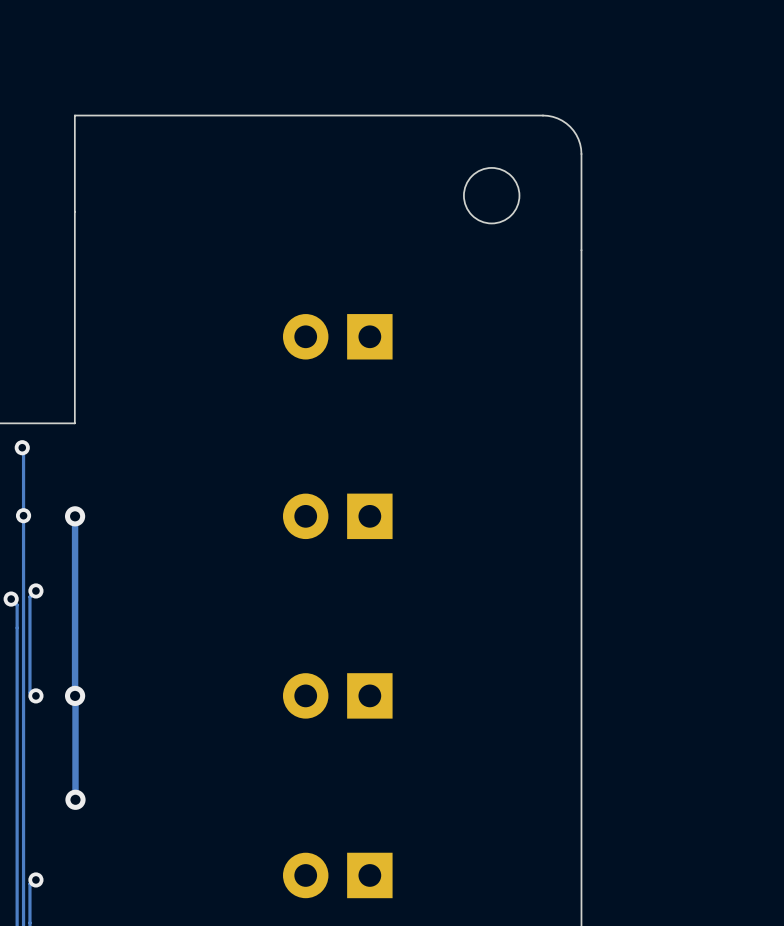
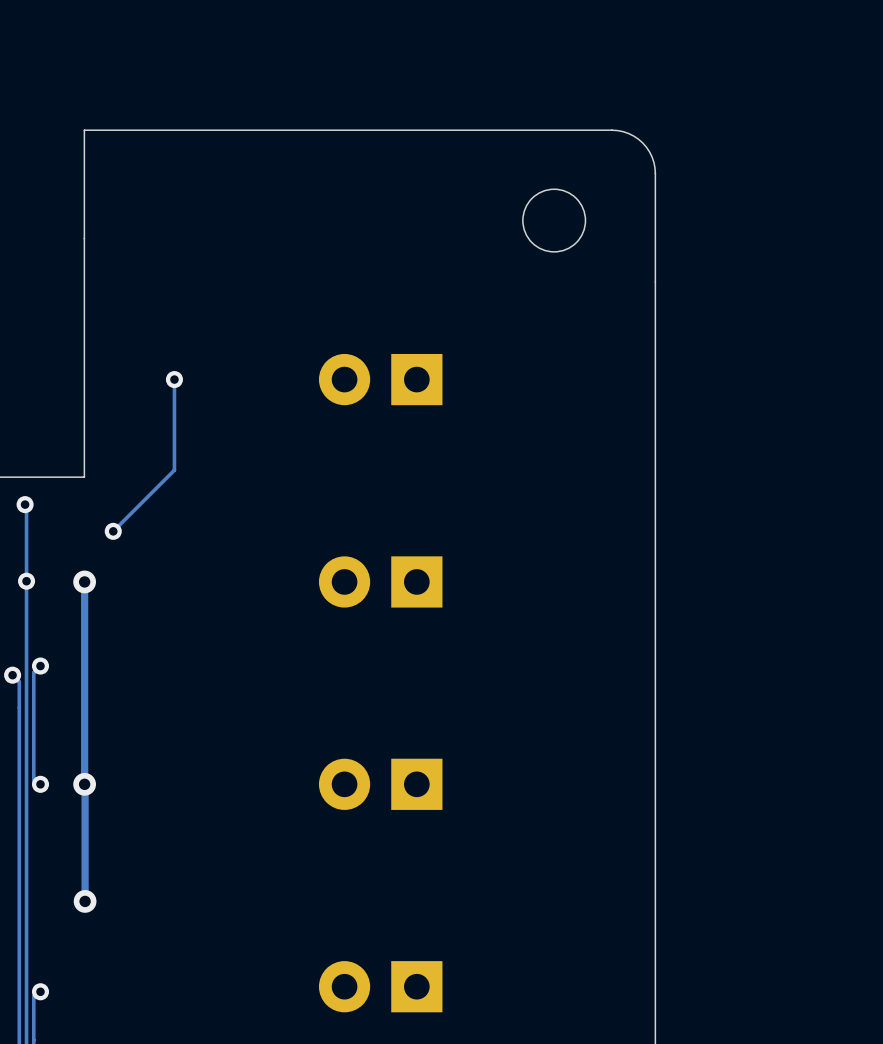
track: none -> (174, 379) (174, 470) (113, 531)
via: none -> (174, 379)
via: none -> (113, 531)

